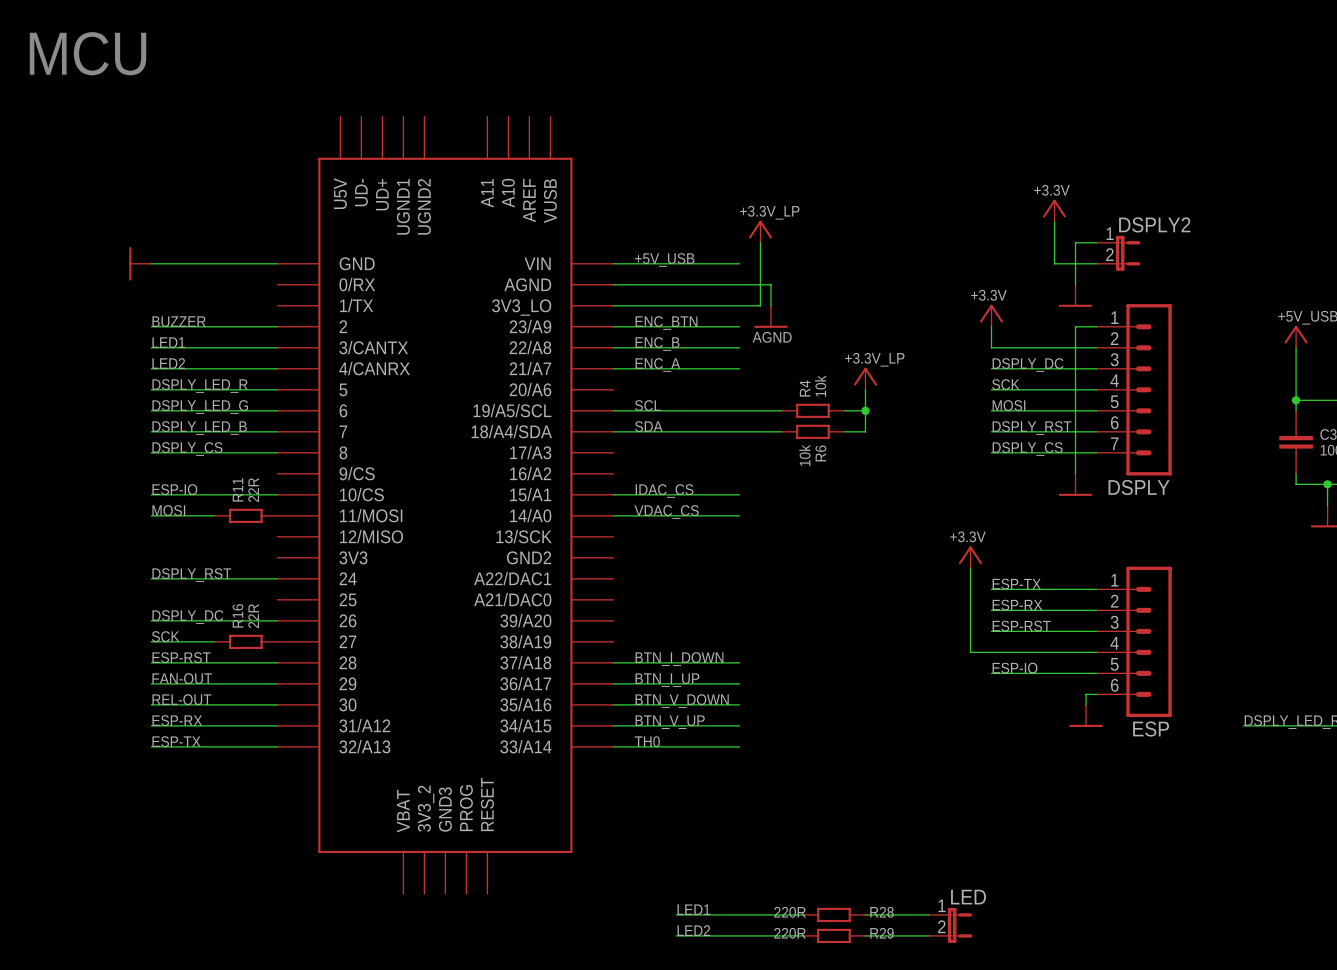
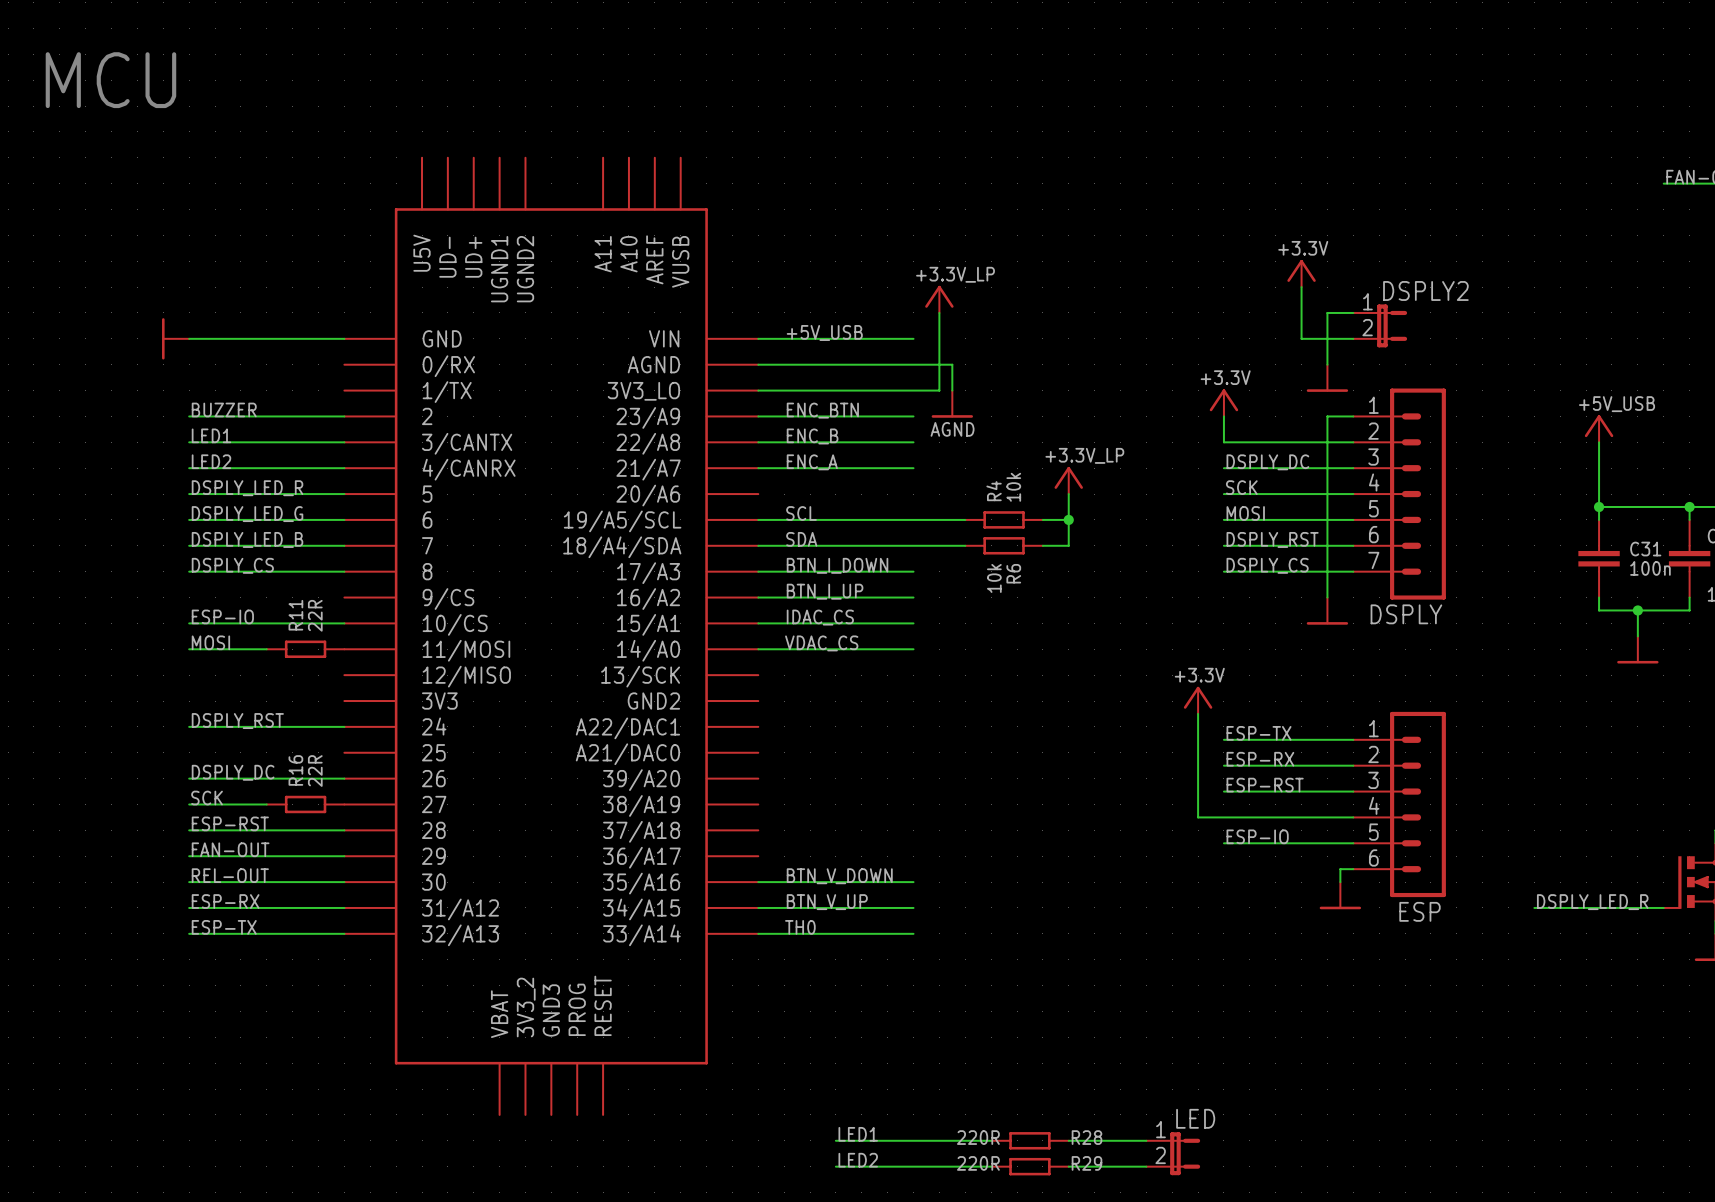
label: none -> BTN_I_DOWN (837, 565)
wire: none -> (758, 571) (913, 571)
label: none -> BTN_I_UP (825, 591)
label: BTN_I_DOWN (679, 659) -> none
wire: (613, 662) (739, 662) -> (758, 597) (913, 597)
label: BTN_I_UP (667, 680) -> none
wire: (613, 683) (739, 683) -> none

